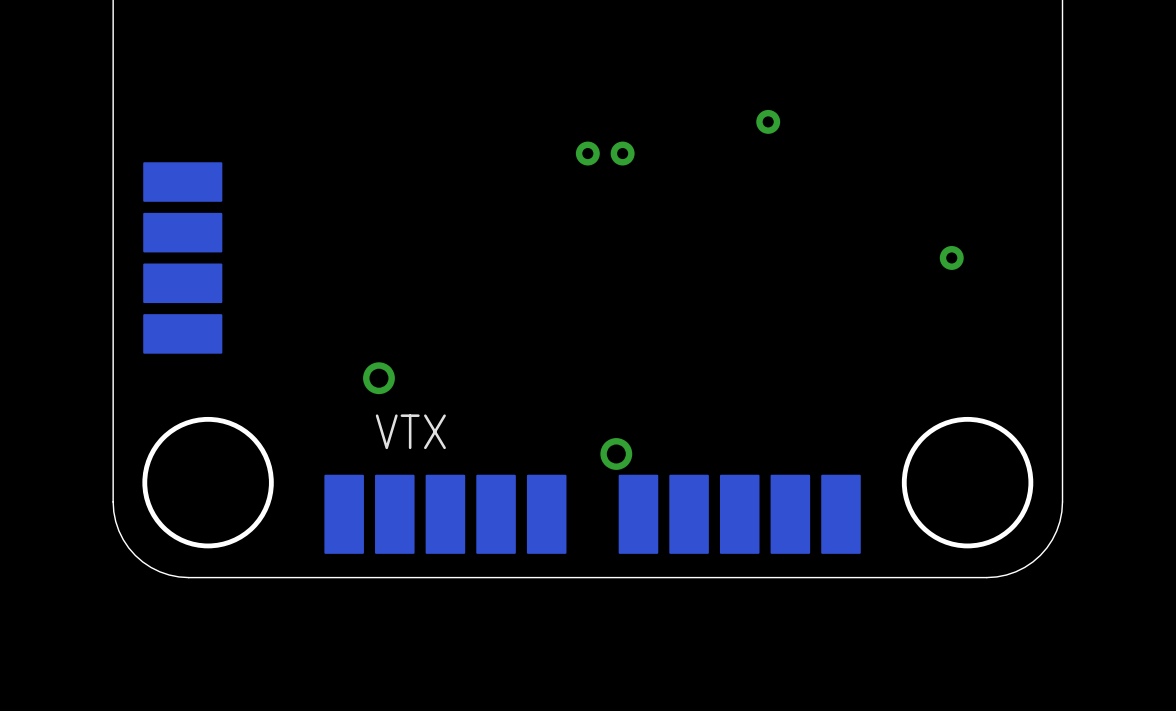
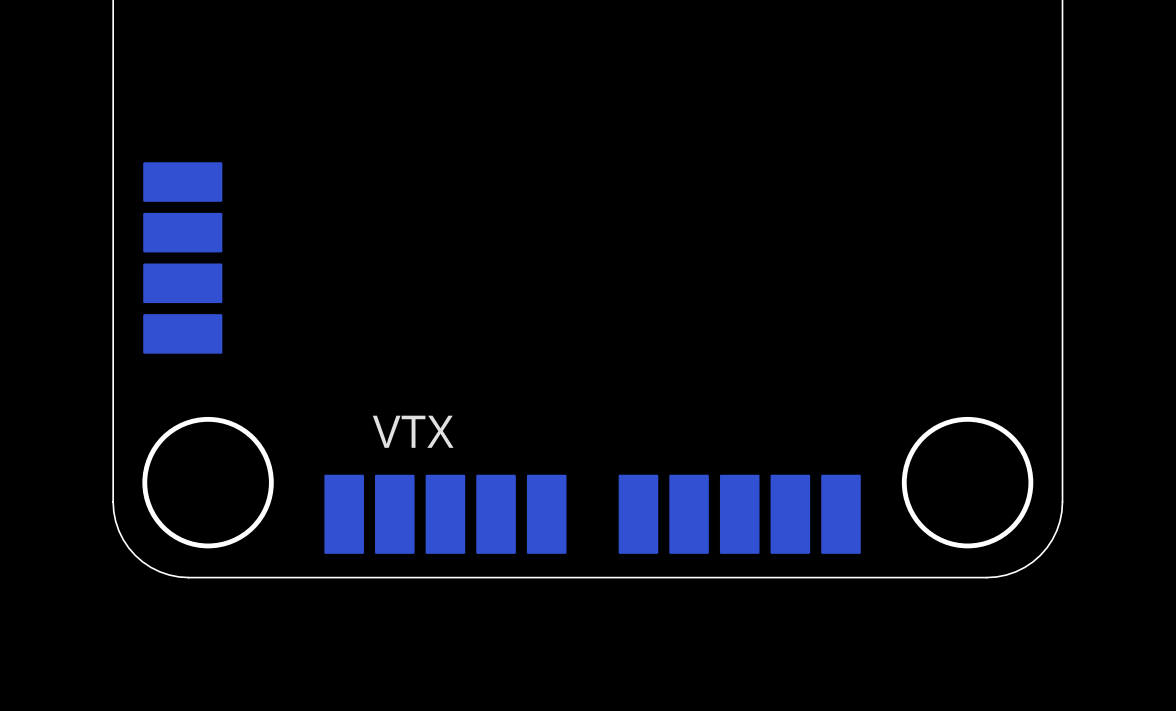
via: (768, 121) -> none
via: (587, 153) -> none
via: (622, 153) -> none
via: (951, 257) -> none
via: (378, 378) -> none
via: (616, 453) -> none

